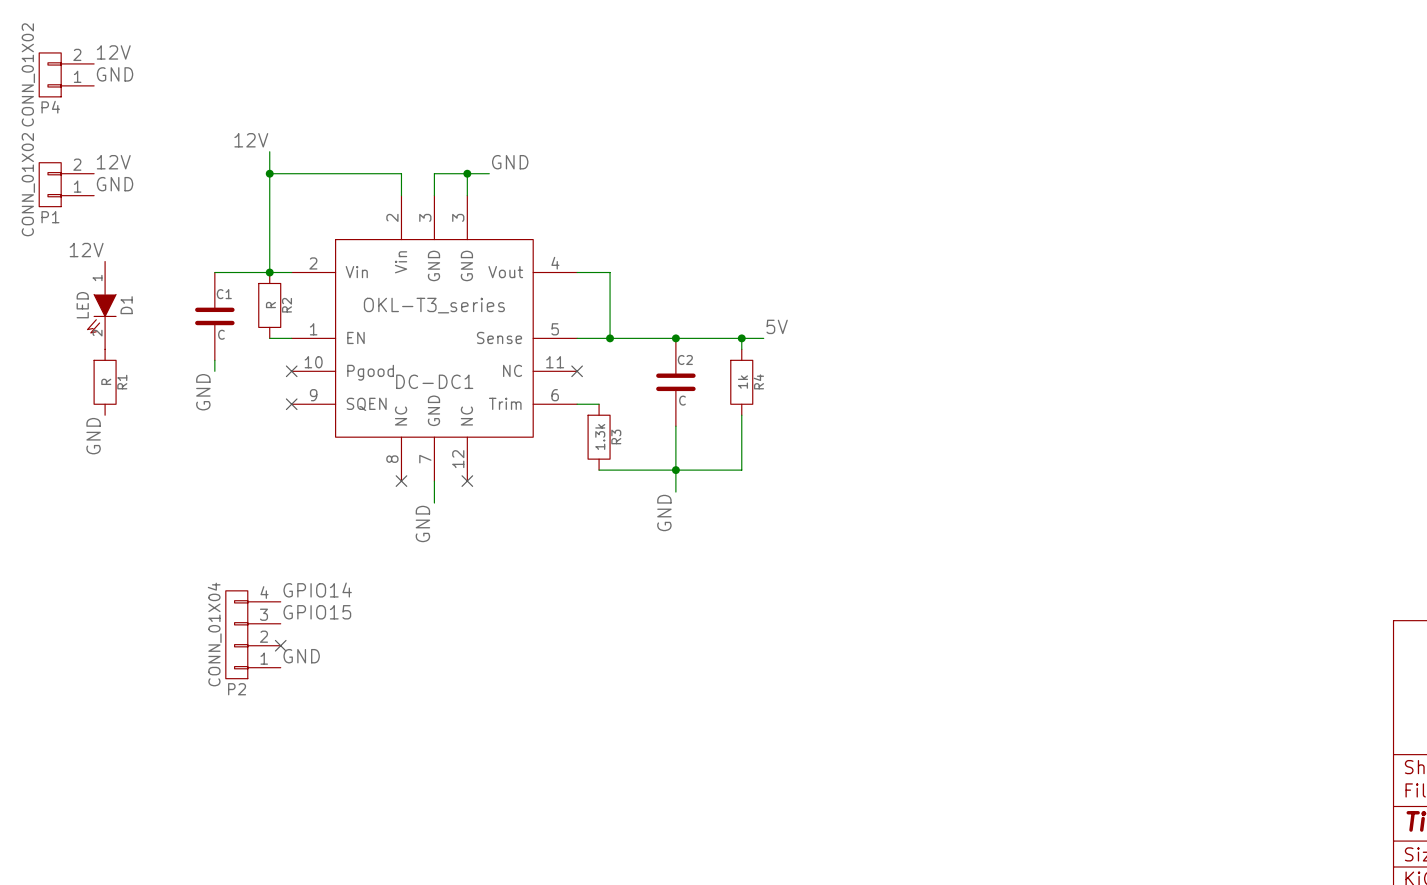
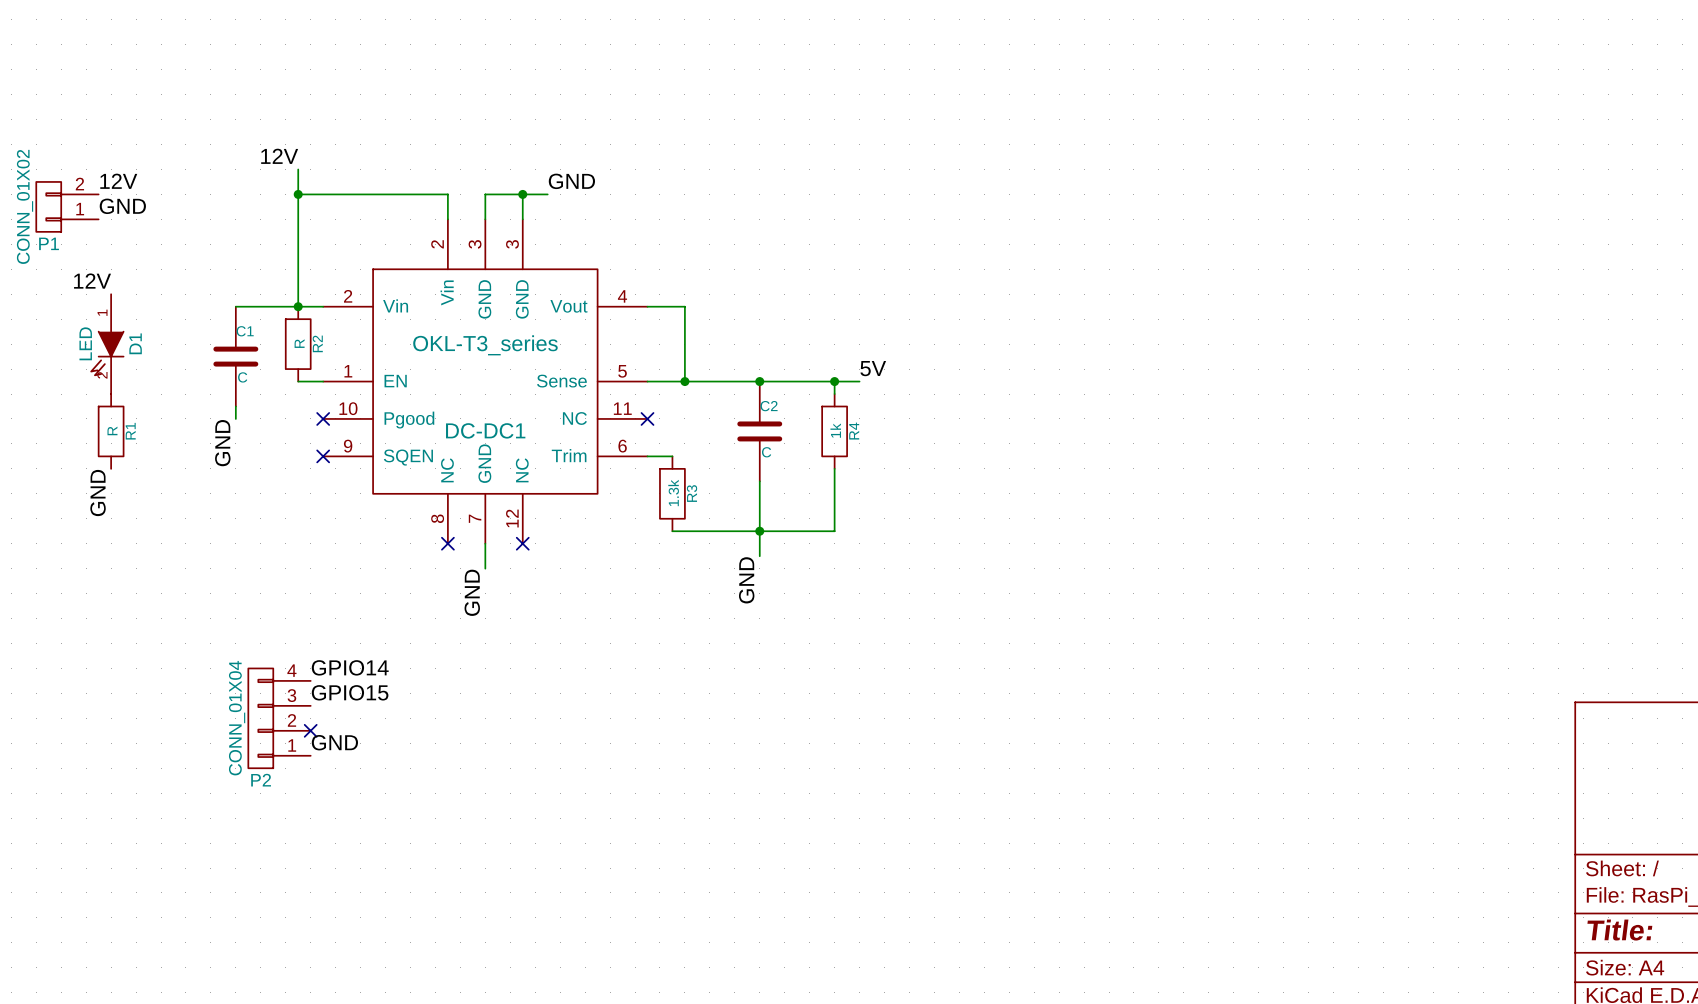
label: 12V (113, 52) -> none
P4: CONN_01X02 (66, 74) -> none
label: GND (115, 74) -> none

